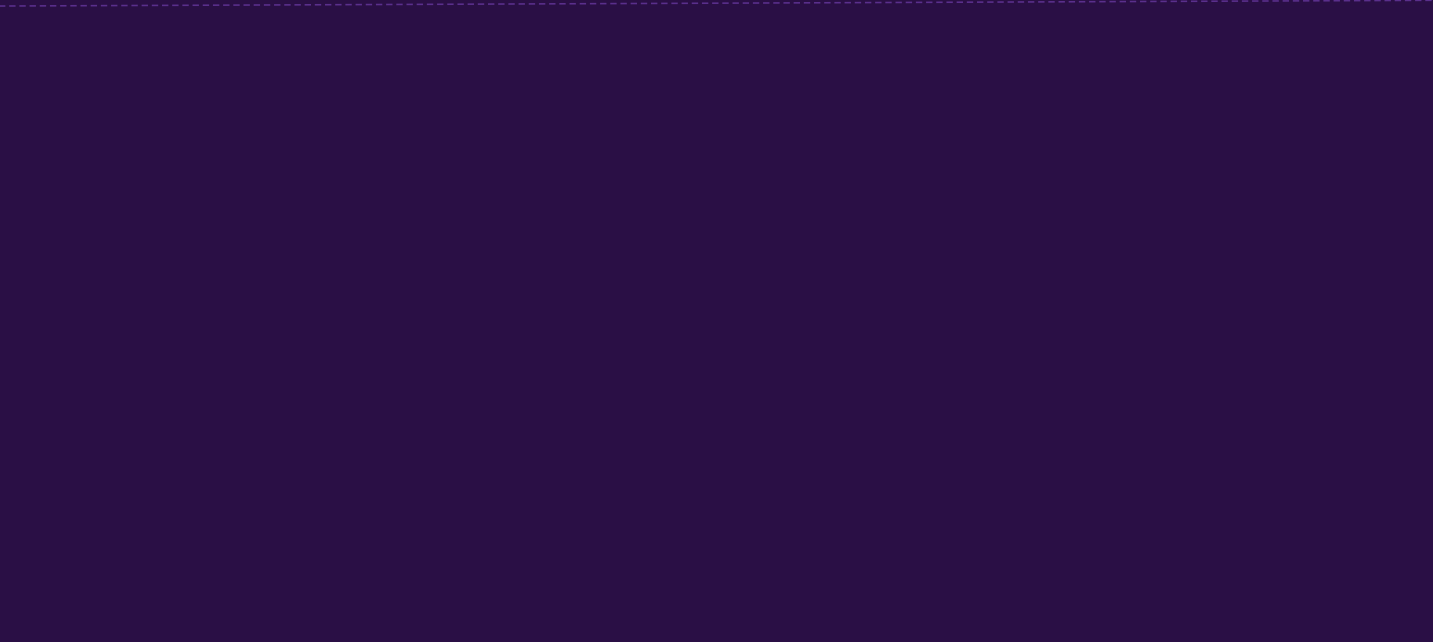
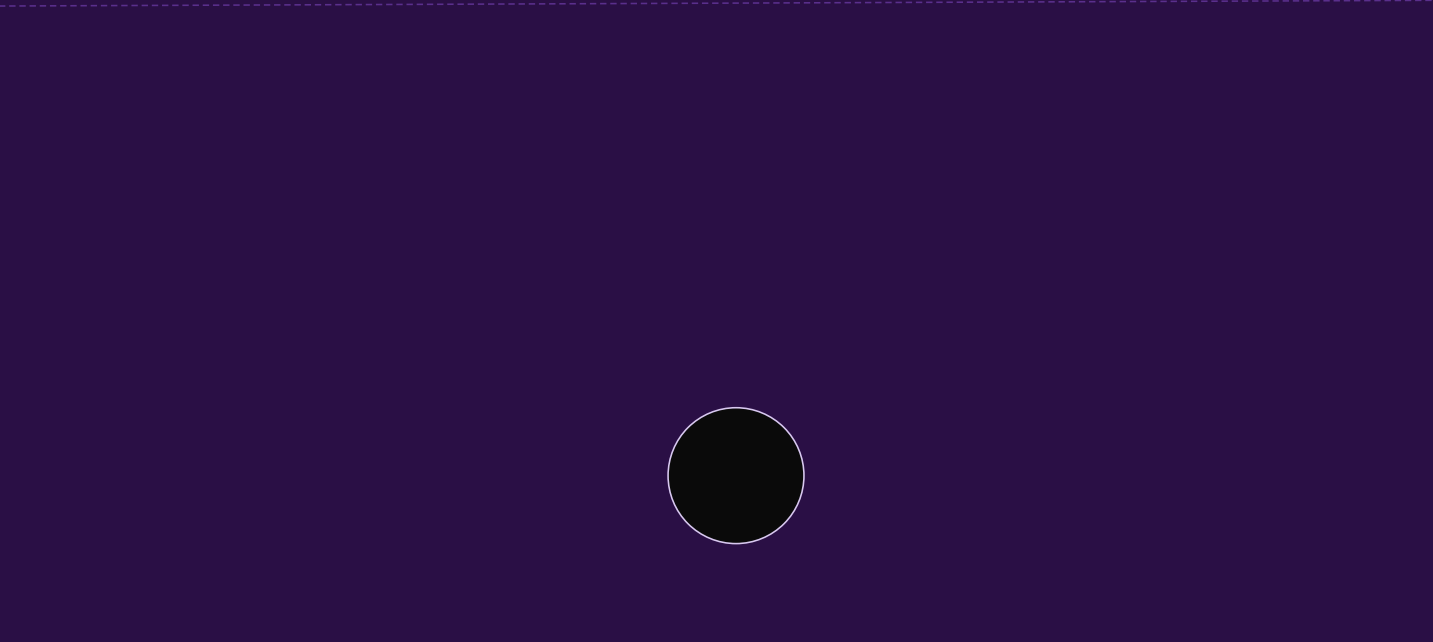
part: none -> (736, 475)

